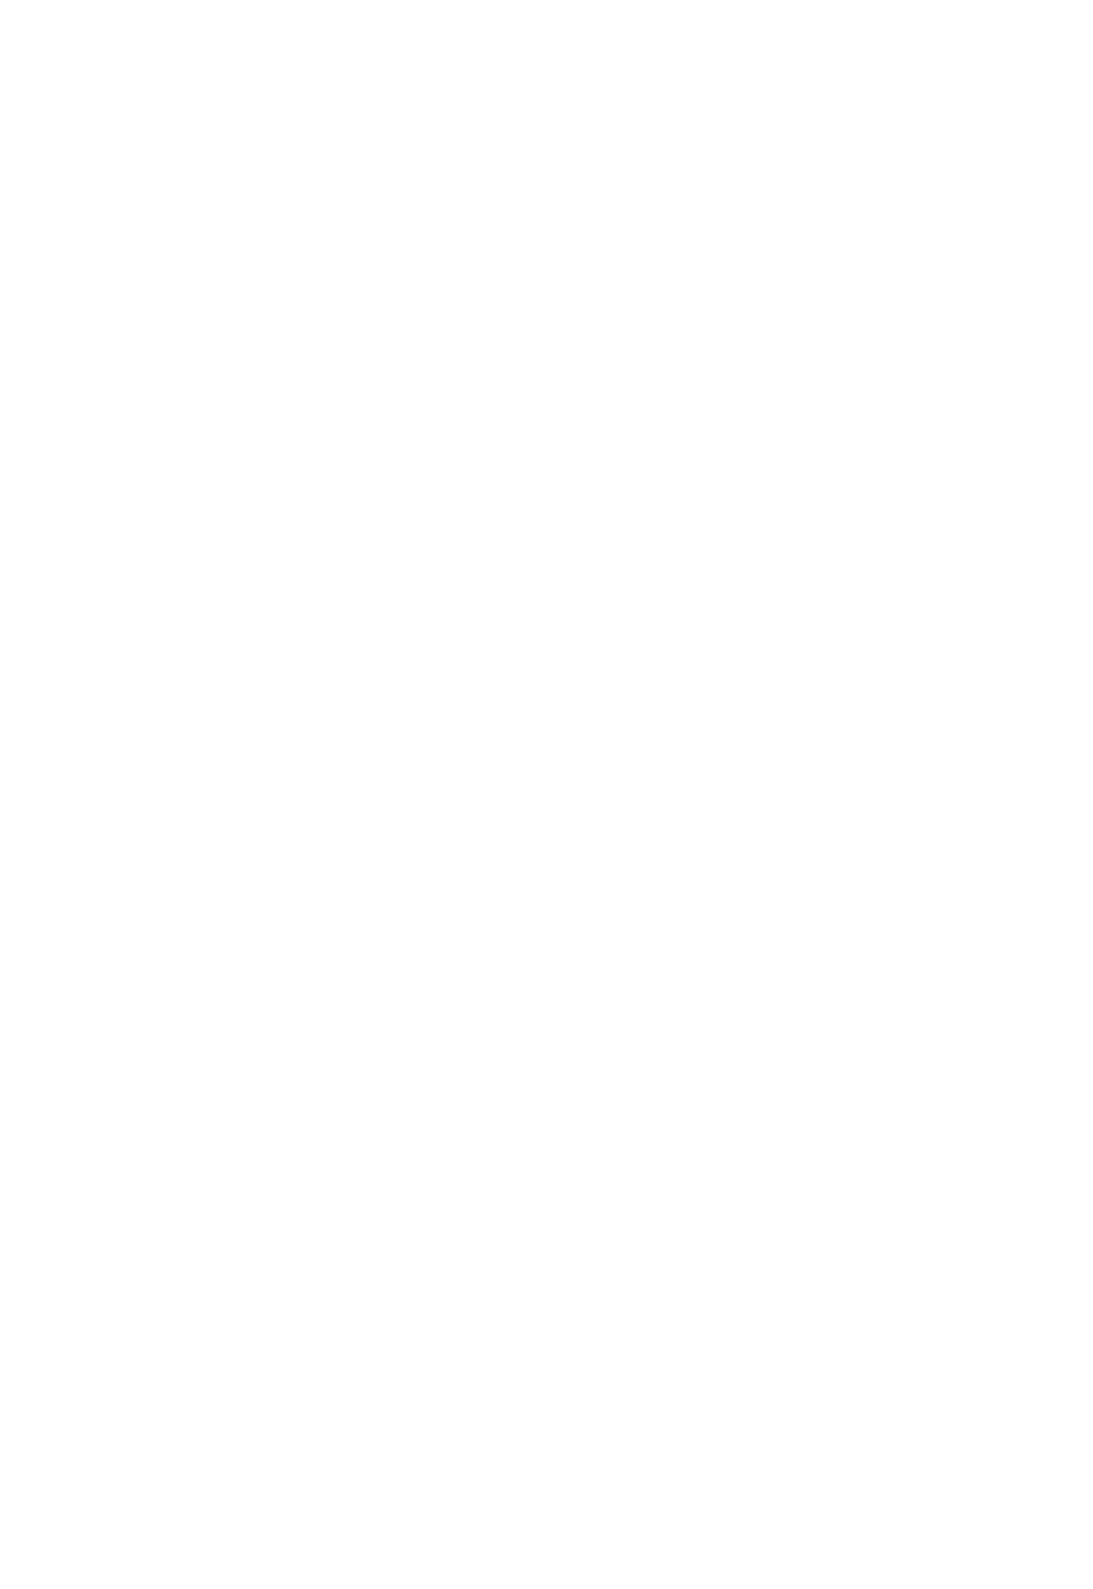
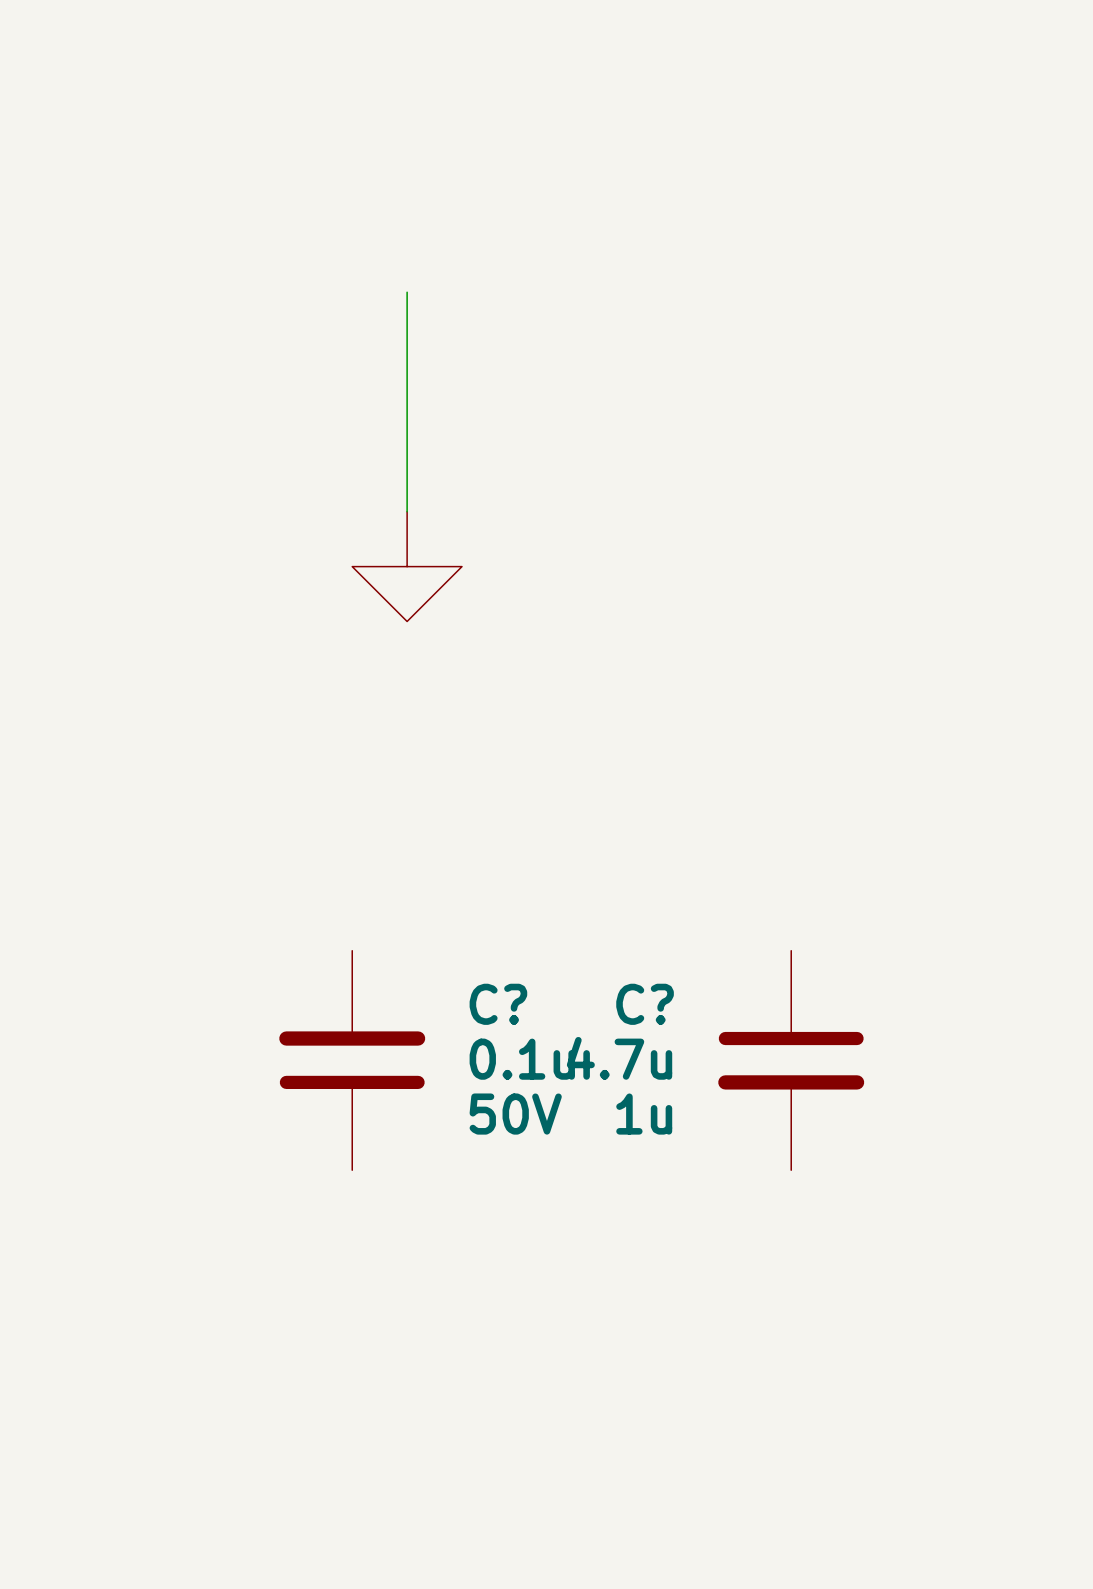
wire: none -> (407, 292) (407, 511)
power symbol: none -> (407, 566)
C?: none -> 0.1u (352, 1060)
C?: none -> 4.7u (791, 1060)

